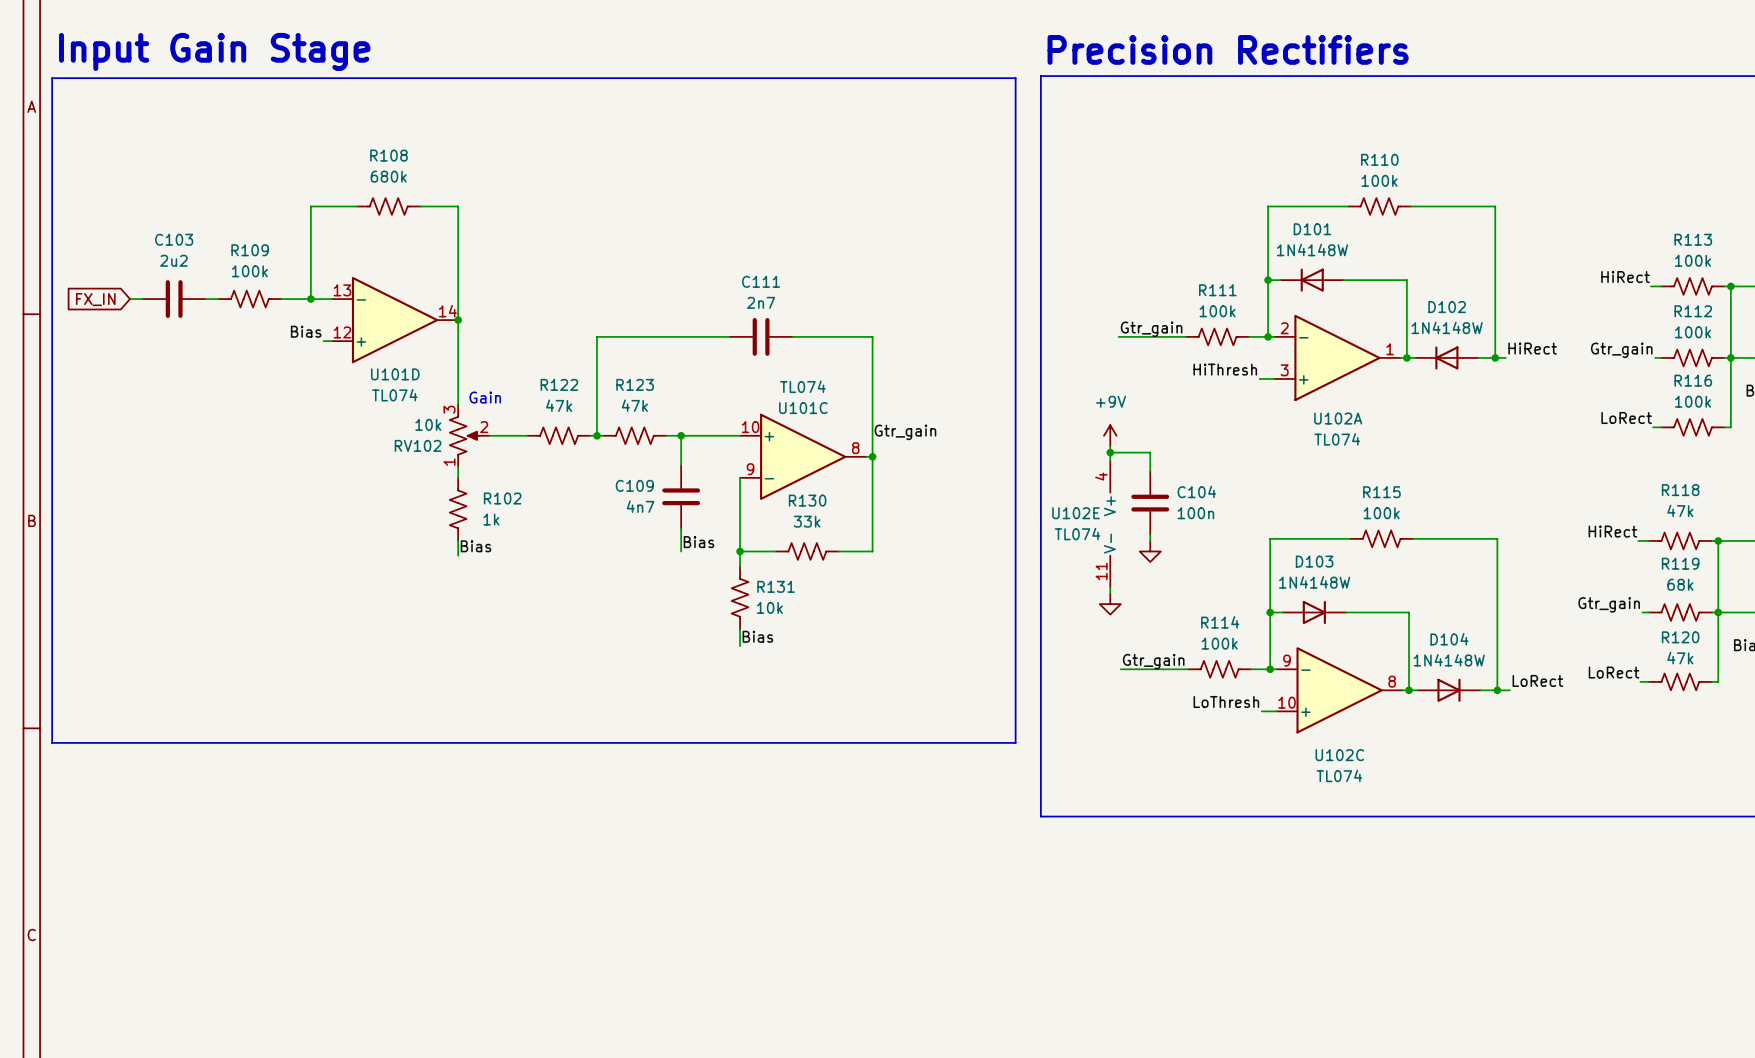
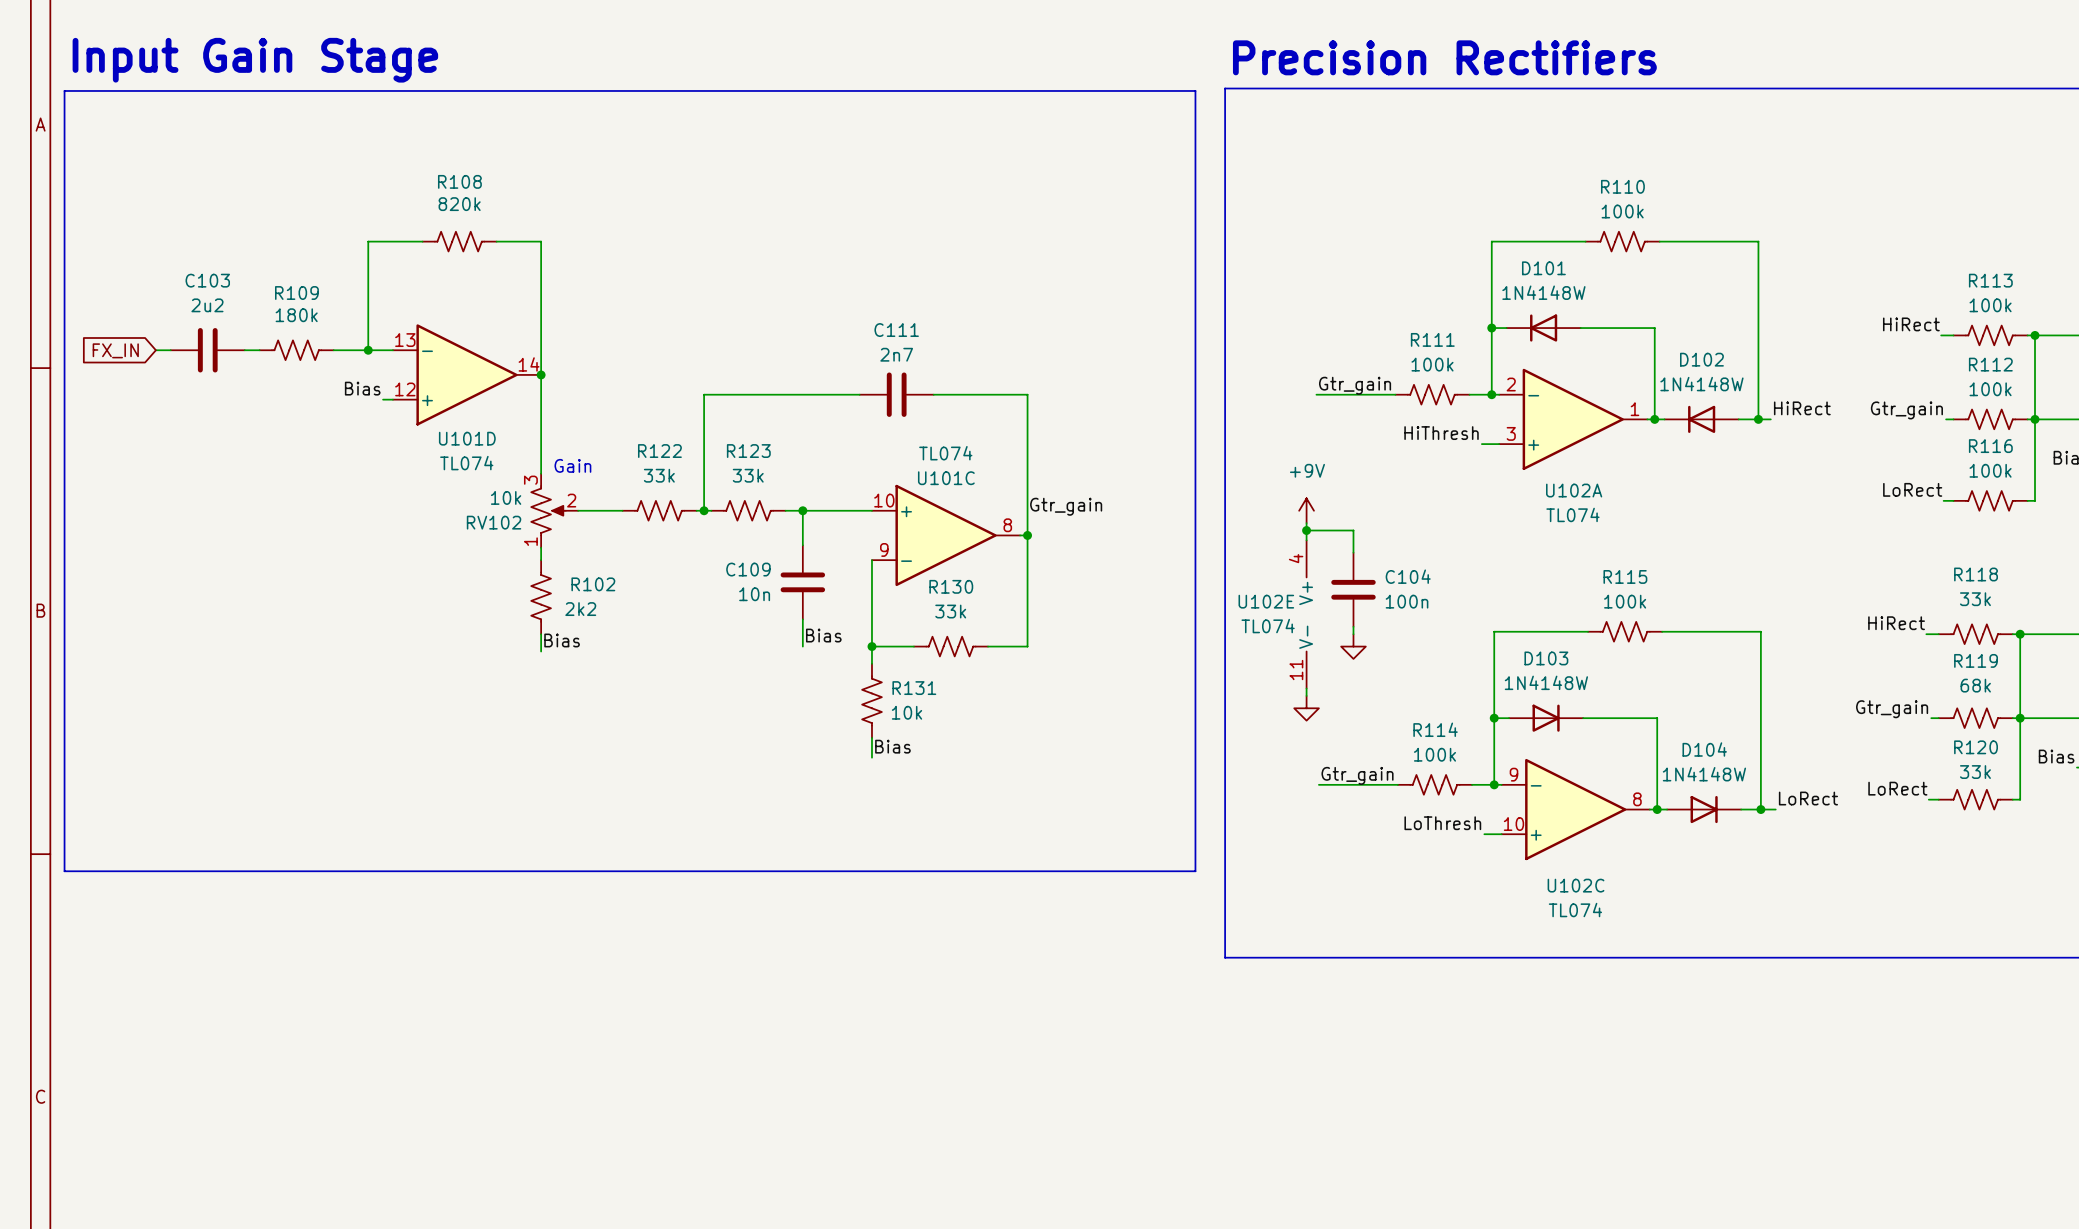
R108 value: 680k (388, 176) -> 820k (459, 204)
R109 value: 100k (249, 271) -> 180k (296, 315)
R122 value: 47k (559, 405) -> 33k (659, 475)
R123 value: 47k (634, 405) -> 33k (748, 475)
C109 value: 4n7 (640, 506) -> 10n (754, 594)
R118 value: 47k (1680, 510) -> 33k (1975, 599)
R102 value: 1k (491, 519) -> 2k2 (580, 609)
R120 value: 47k (1680, 658) -> 33k (1975, 772)

